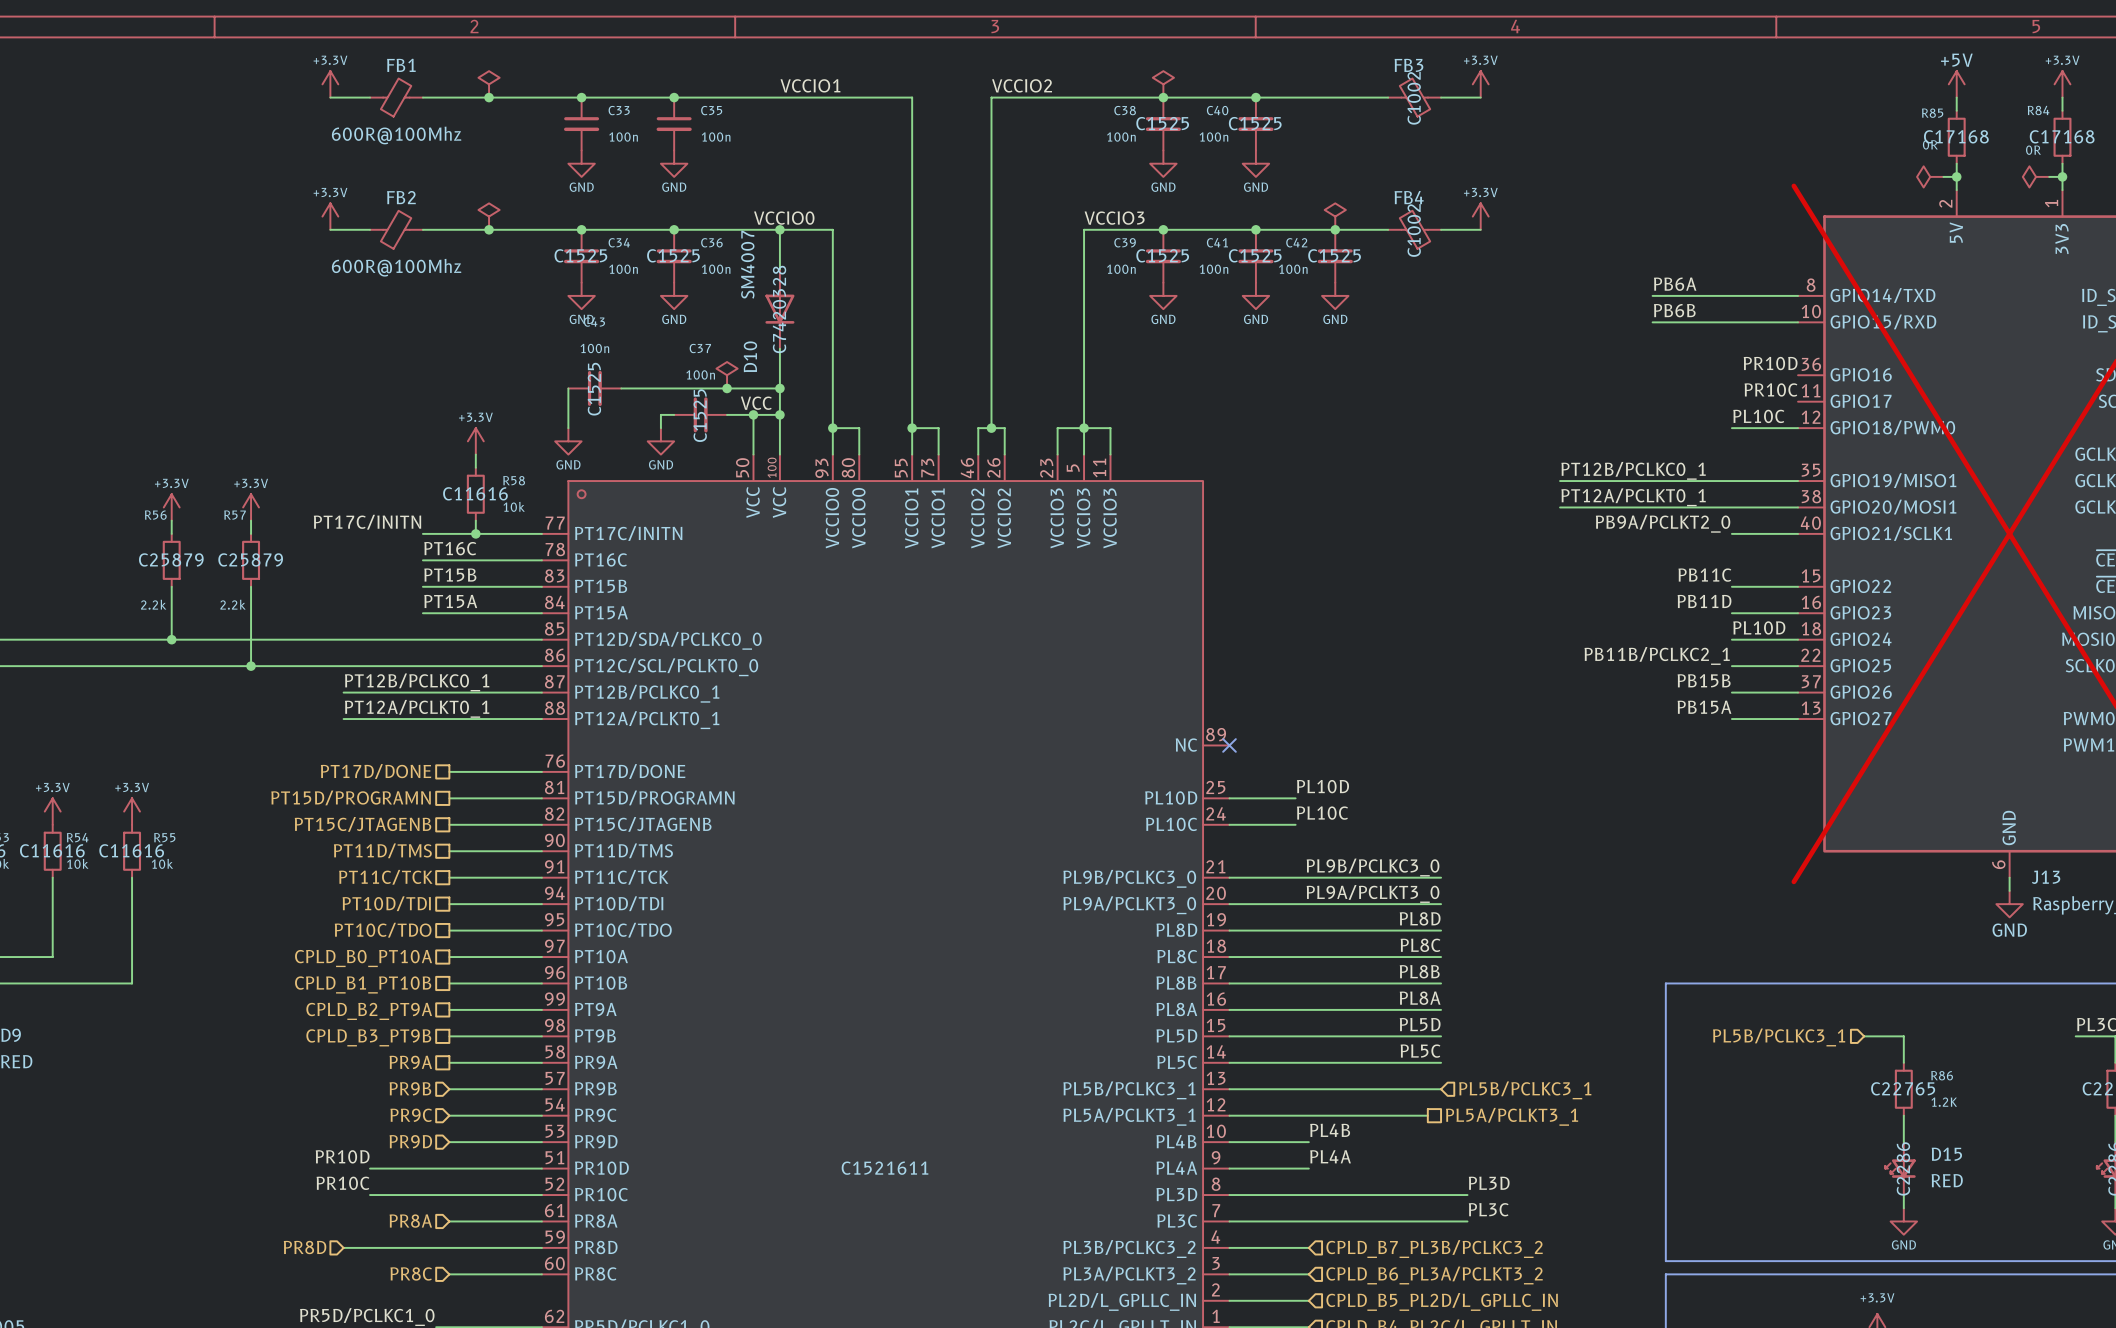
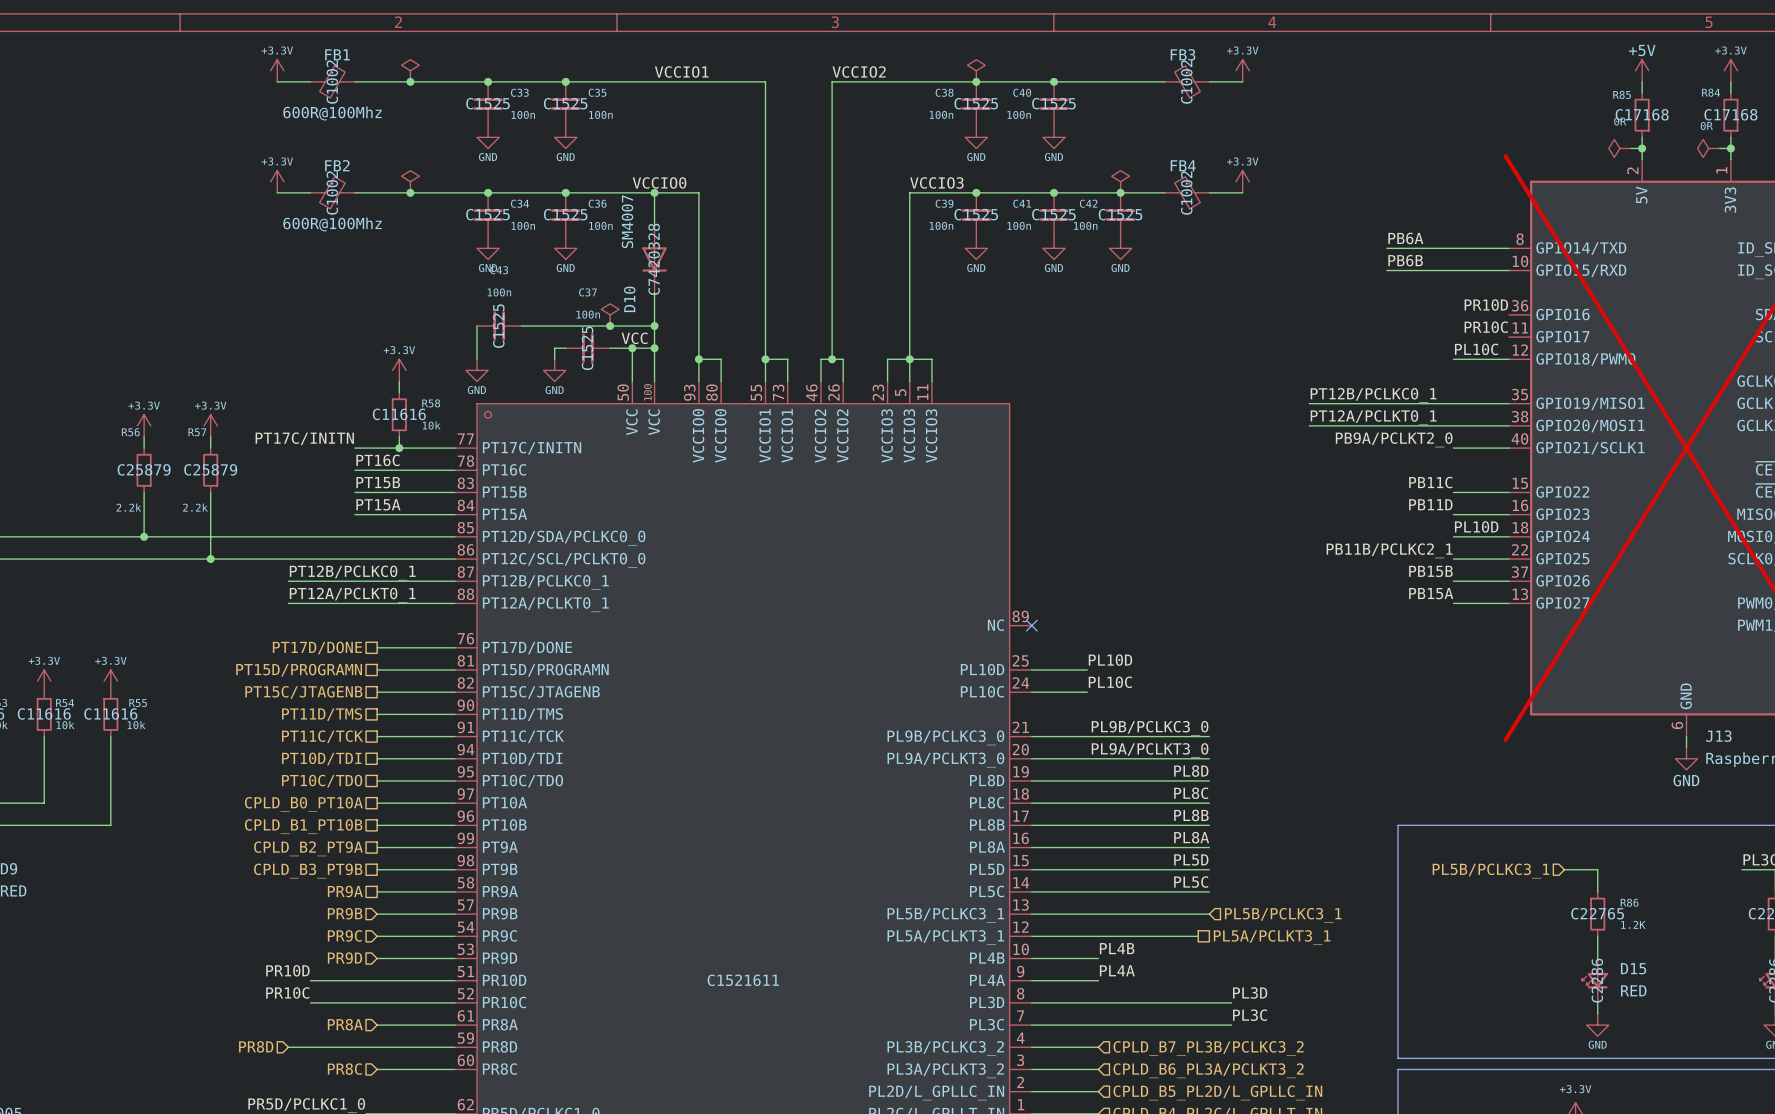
FB1 text: none -> C1002 (332, 82)
C33 text: none -> C1525 (488, 103)
C35 text: none -> C1525 (565, 103)
FB2 text: none -> C1002 (332, 192)

